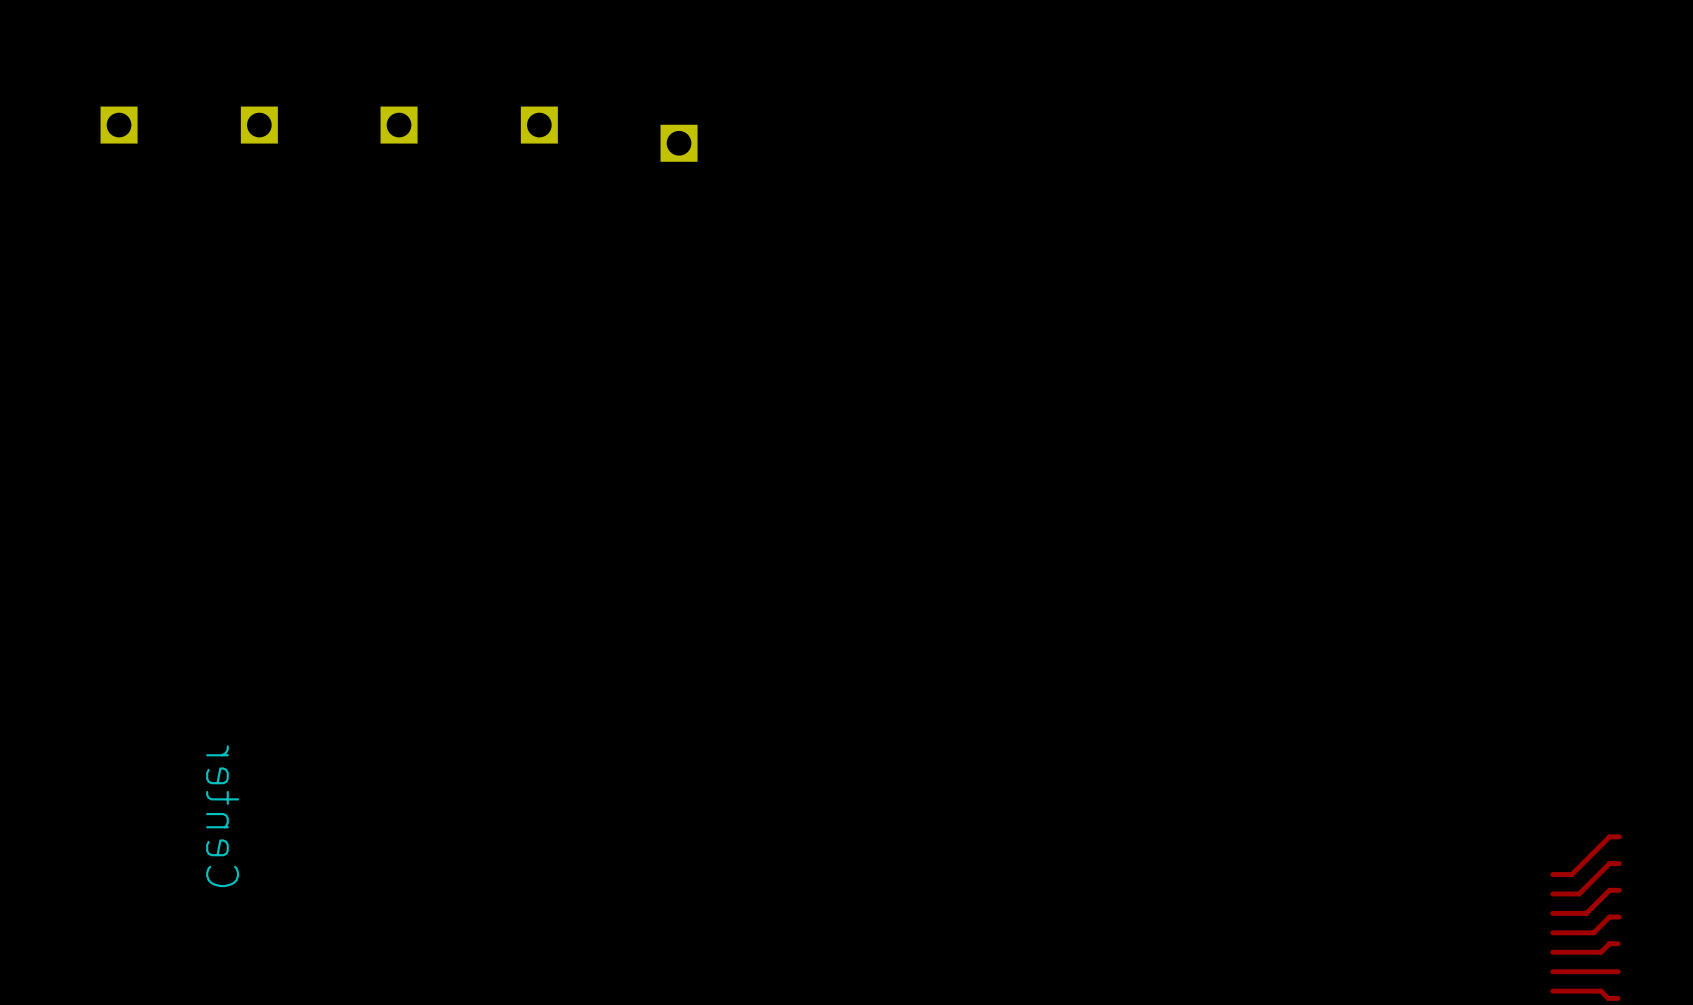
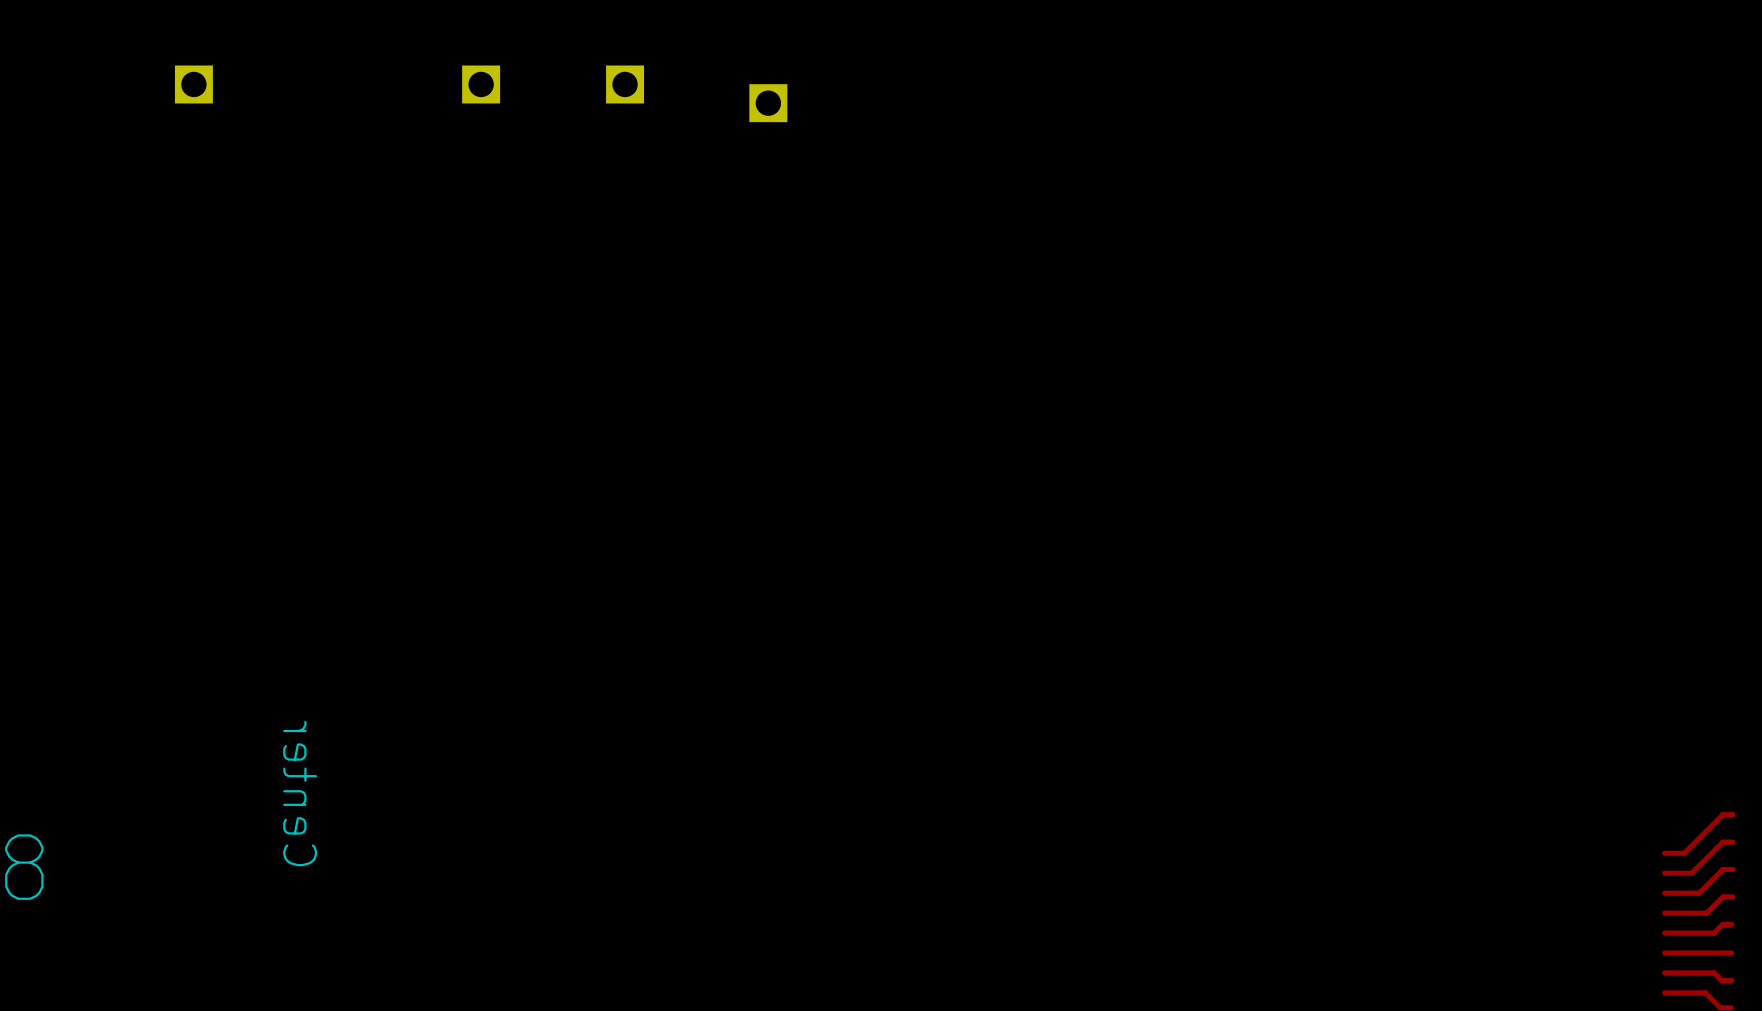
part: (259, 125) -> none

